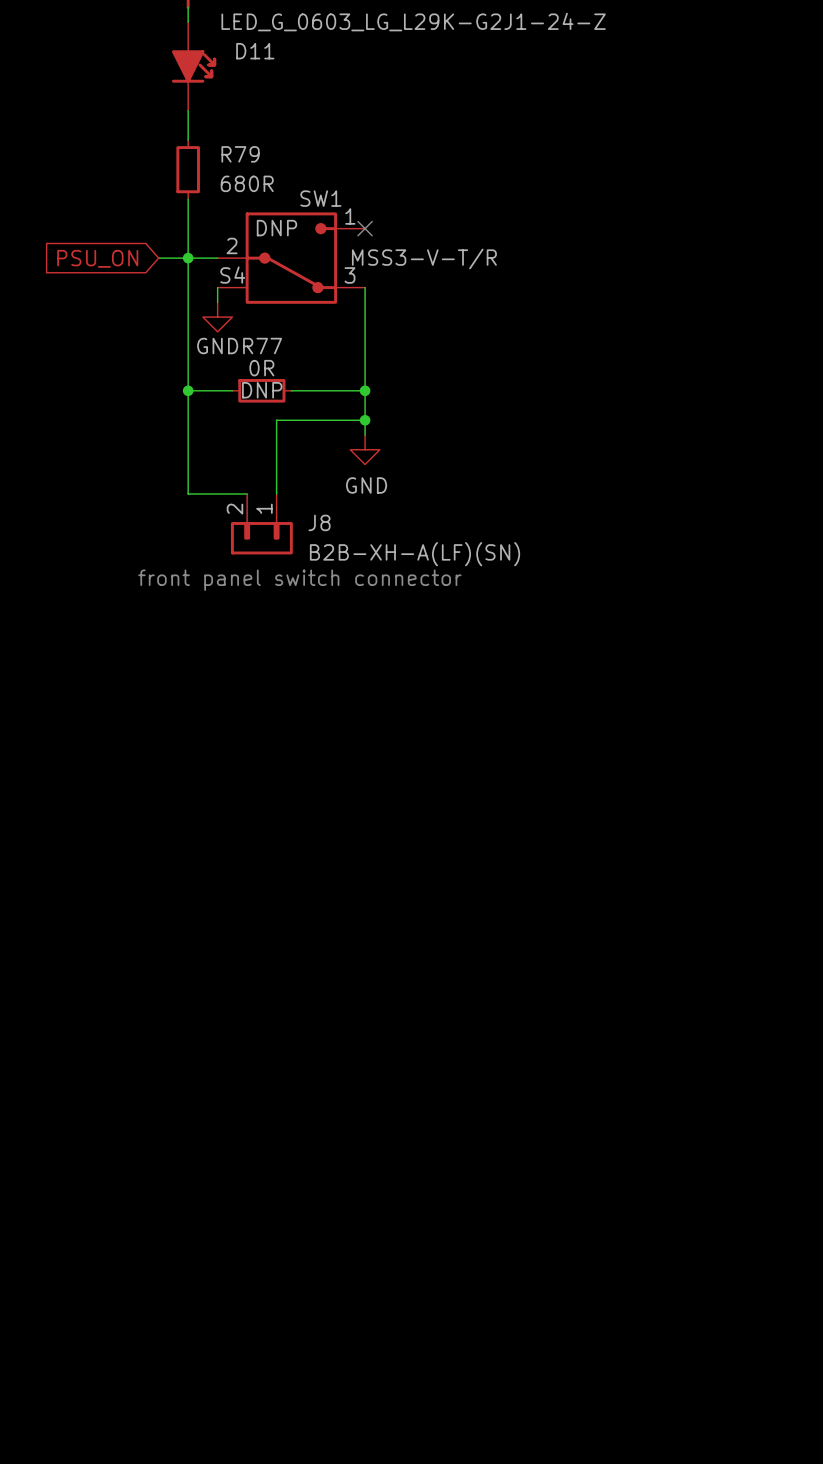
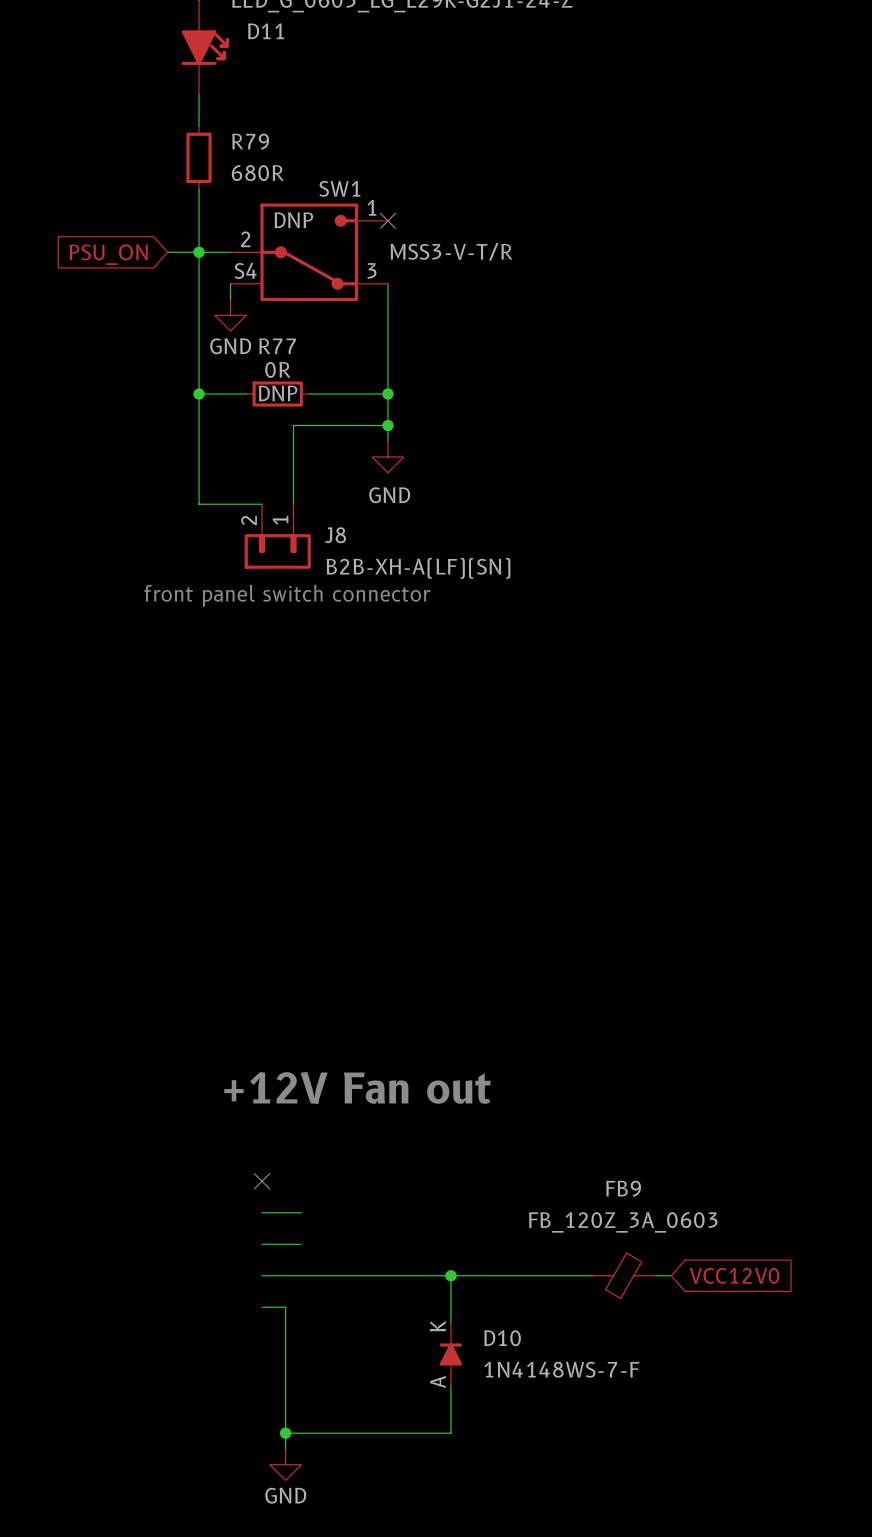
text: none -> +12V Fan out (357, 1088)
no-connect mark: none -> (262, 1181)
wire: none -> (262, 1212) (301, 1212)
wire: none -> (262, 1244) (301, 1244)
wire: none -> (262, 1275) (592, 1275)
wire: none -> (450, 1275) (450, 1322)
junction: none -> (450, 1275)
FB9: none -> FB_120Z_3A_0603 (624, 1275)
wire: none -> (655, 1275) (671, 1275)
global label: none -> VCC12V0 (734, 1275)
wire: none -> (262, 1307) (285, 1307) (285, 1448)
D10: none -> (450, 1354)
wire: none -> (450, 1385) (450, 1433) (285, 1433)
junction: none -> (285, 1433)
power symbol: none -> GND (285, 1464)

